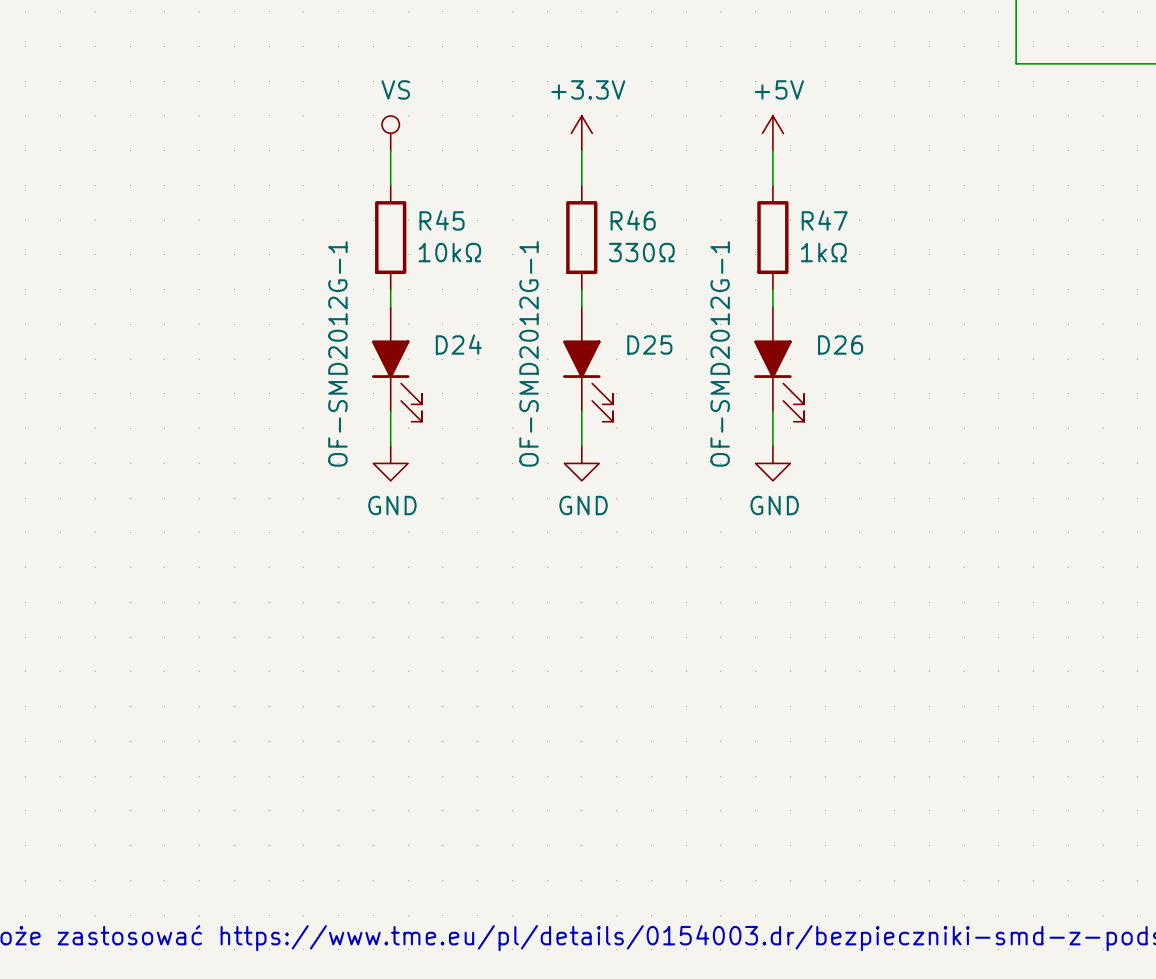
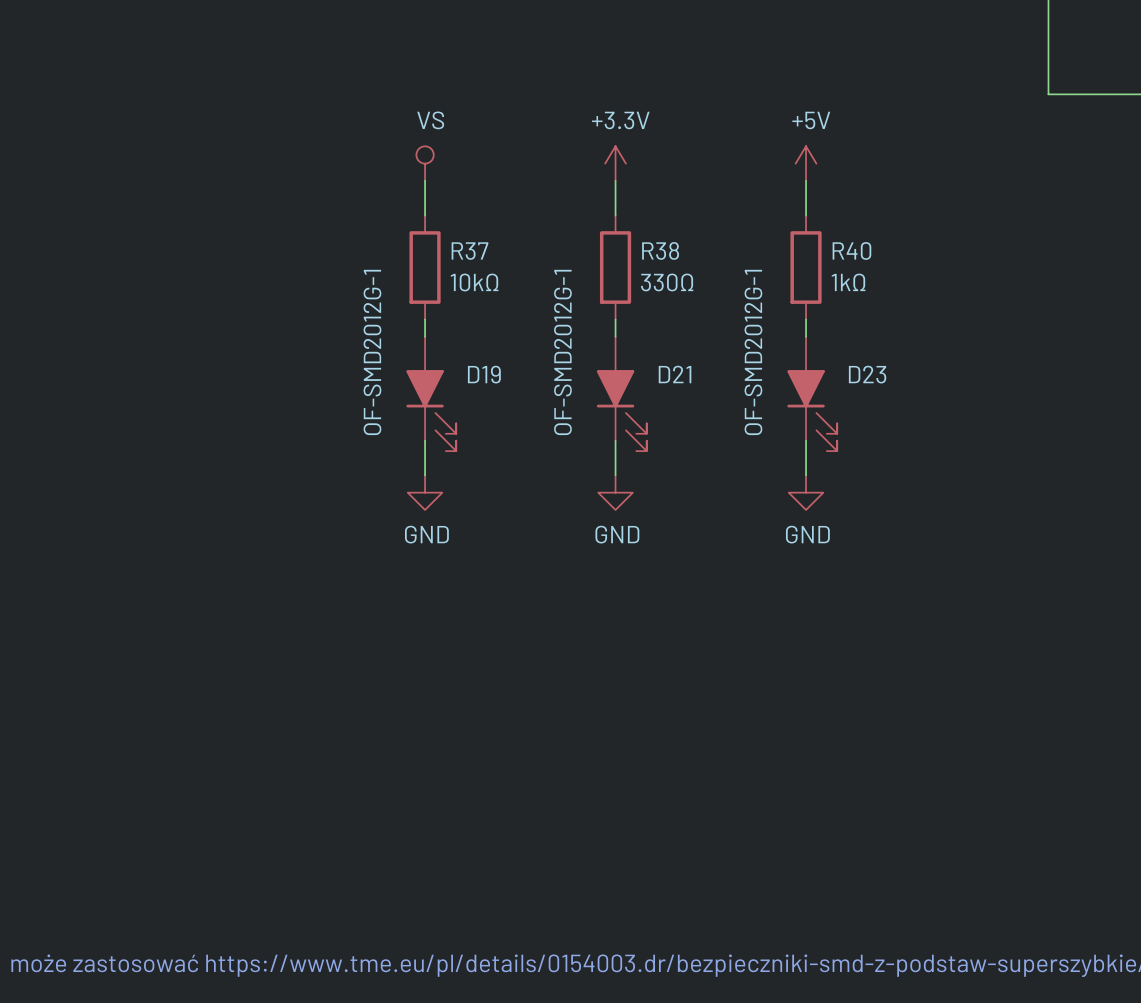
R45 name: R45 (442, 220) -> R37 (469, 251)
R46 name: R46 (633, 220) -> R38 (660, 250)
R47 name: R47 (824, 220) -> R40 (851, 250)
D24 name: D24 (458, 344) -> D19 (484, 374)
D25 name: D25 (649, 344) -> D21 (675, 374)
D26 name: D26 (840, 344) -> D23 (867, 374)

